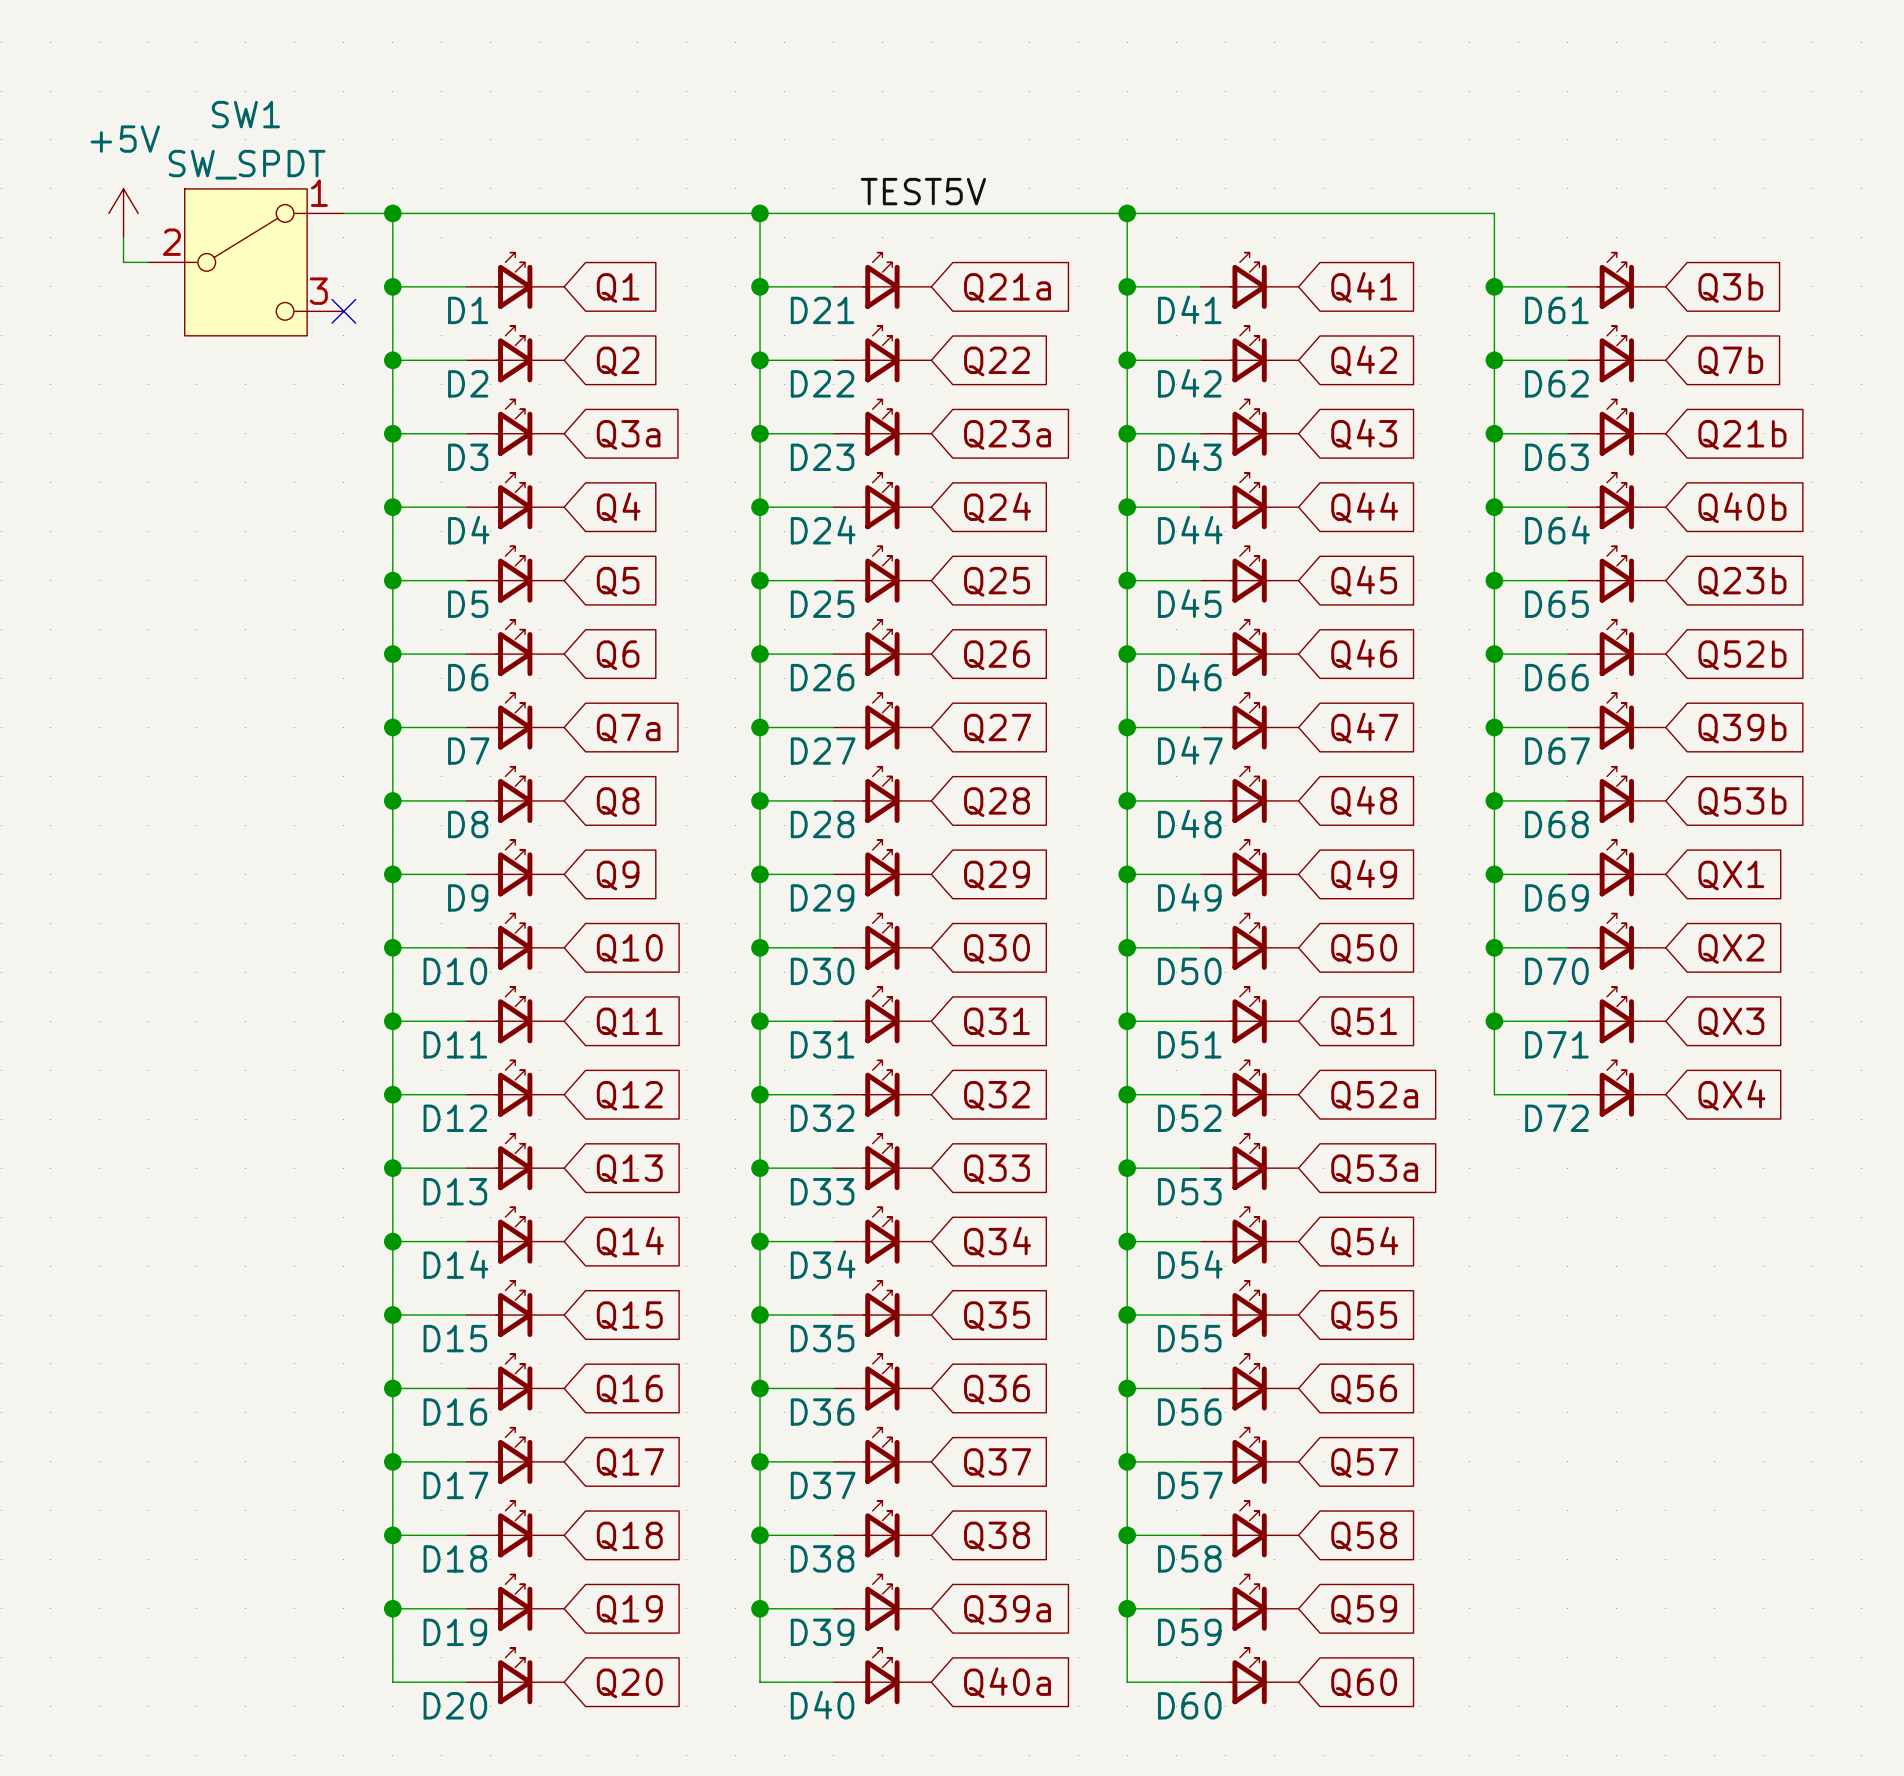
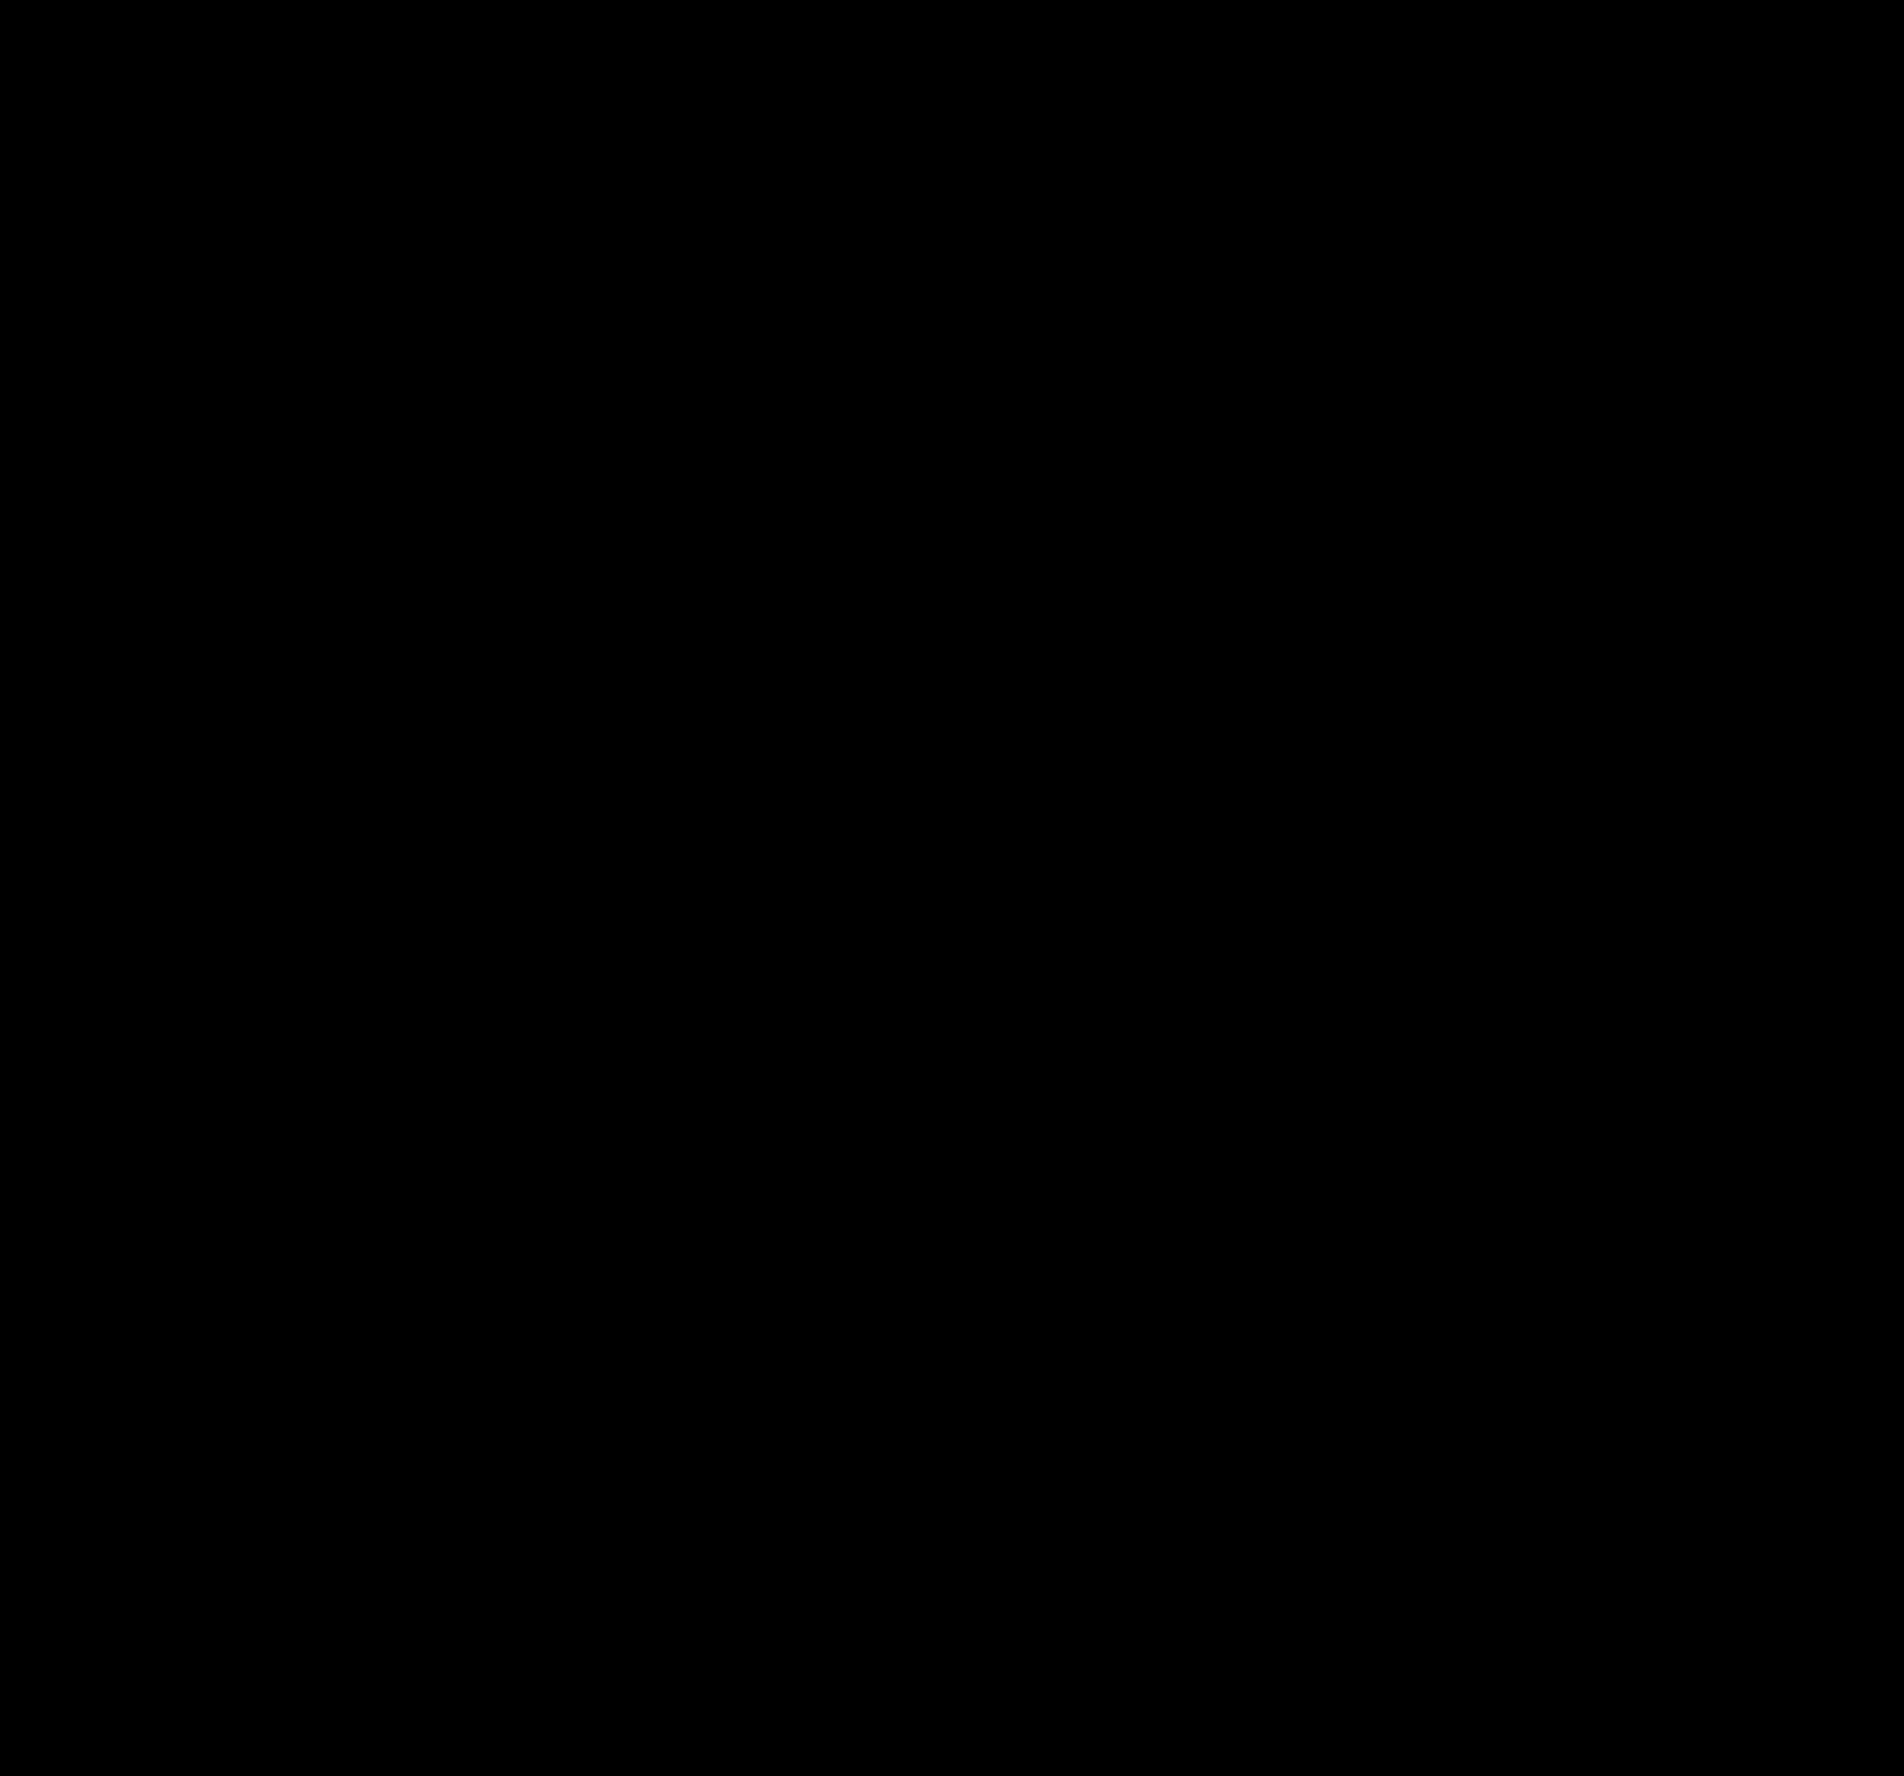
label: TEST5V (923, 191) -> none
power symbol: +5V (123, 213) -> none
wire: (343, 213) (1494, 213) (1494, 1094) (1567, 1094) -> none
wire: (392, 213) (392, 1682) (466, 1682) -> none
junction: (392, 213) -> none
wire: (760, 213) (760, 1682) (833, 1682) -> none
junction: (760, 213) -> none
wire: (1127, 213) (1127, 1682) (1200, 1682) -> none
junction: (1127, 213) -> none
wire: (123, 237) (123, 262) (148, 262) -> none
SW1: SW_SPDT (245, 262) -> none
D1: (515, 280) -> none
D21: (882, 280) -> none
D41: (1249, 280) -> none
D61: (1616, 280) -> none
wire: (392, 286) (466, 286) -> none
junction: (392, 286) -> none
wire: (760, 286) (833, 286) -> none
junction: (760, 286) -> none
wire: (1127, 286) (1200, 286) -> none
junction: (1127, 286) -> none
wire: (1494, 286) (1567, 286) -> none
junction: (1494, 286) -> none
global label: Q41 (1364, 287) -> none
global label: Q1 (618, 288) -> none
global label: Q21a (1007, 288) -> none
global label: Q3b (1730, 288) -> none
no-connect mark: (343, 311) -> none
D2: (515, 354) -> none
D22: (882, 354) -> none
D42: (1249, 354) -> none
D62: (1616, 354) -> none
wire: (392, 360) (466, 360) -> none
junction: (392, 360) -> none
wire: (760, 360) (833, 360) -> none
junction: (760, 360) -> none
wire: (1127, 360) (1200, 360) -> none
junction: (1127, 360) -> none
global label: Q42 (1364, 360) -> none
wire: (1494, 360) (1567, 360) -> none
junction: (1494, 360) -> none
global label: Q2 (618, 361) -> none
global label: Q22 (996, 361) -> none
global label: Q7b (1730, 361) -> none
D3: (515, 427) -> none
D23: (882, 427) -> none
D43: (1249, 427) -> none
D63: (1616, 427) -> none
wire: (392, 433) (466, 433) -> none
junction: (392, 433) -> none
wire: (760, 433) (833, 433) -> none
junction: (760, 433) -> none
wire: (1127, 433) (1200, 433) -> none
junction: (1127, 433) -> none
wire: (1494, 433) (1567, 433) -> none
junction: (1494, 433) -> none
global label: Q3a (628, 434) -> none
global label: Q23a (1007, 434) -> none
global label: Q43 (1364, 434) -> none
global label: Q21b (1742, 434) -> none
D4: (515, 501) -> none
D24: (882, 501) -> none
D44: (1249, 501) -> none
D64: (1616, 501) -> none
wire: (392, 507) (466, 507) -> none
junction: (392, 507) -> none
global label: Q4 (618, 507) -> none
wire: (760, 507) (833, 507) -> none
junction: (760, 507) -> none
global label: Q24 (997, 507) -> none
wire: (1127, 507) (1200, 507) -> none
junction: (1127, 507) -> none
global label: Q44 (1364, 507) -> none
wire: (1494, 507) (1567, 507) -> none
junction: (1494, 507) -> none
global label: Q40b (1742, 507) -> none
D5: (515, 574) -> none
D25: (882, 574) -> none
D45: (1249, 574) -> none
D65: (1616, 574) -> none
wire: (392, 580) (466, 580) -> none
junction: (392, 580) -> none
wire: (760, 580) (833, 580) -> none
junction: (760, 580) -> none
wire: (1127, 580) (1200, 580) -> none
junction: (1127, 580) -> none
wire: (1494, 580) (1567, 580) -> none
junction: (1494, 580) -> none
global label: Q5 (618, 581) -> none
global label: Q25 (996, 581) -> none
global label: Q45 (1364, 581) -> none
global label: Q23b (1742, 581) -> none
D6: (515, 647) -> none
D26: (882, 647) -> none
D46: (1249, 647) -> none
D66: (1616, 647) -> none
wire: (392, 654) (466, 654) -> none
junction: (392, 654) -> none
wire: (760, 654) (833, 654) -> none
junction: (760, 654) -> none
wire: (1127, 654) (1200, 654) -> none
junction: (1127, 654) -> none
global label: Q46 (1364, 654) -> none
wire: (1494, 654) (1567, 654) -> none
junction: (1494, 654) -> none
global label: Q6 (618, 655) -> none
global label: Q26 (996, 655) -> none
global label: Q52b (1742, 655) -> none
D7: (515, 721) -> none
D27: (882, 721) -> none
D47: (1249, 721) -> none
D67: (1616, 721) -> none
wire: (392, 727) (466, 727) -> none
junction: (392, 727) -> none
wire: (760, 727) (833, 727) -> none
junction: (760, 727) -> none
wire: (1127, 727) (1200, 727) -> none
junction: (1127, 727) -> none
wire: (1494, 727) (1567, 727) -> none
junction: (1494, 727) -> none
global label: Q7a (628, 728) -> none
global label: Q27 (997, 728) -> none
global label: Q47 (1364, 728) -> none
global label: Q39b (1742, 728) -> none
D8: (515, 794) -> none
D28: (882, 794) -> none
D48: (1249, 794) -> none
D68: (1616, 794) -> none
wire: (392, 800) (466, 800) -> none
junction: (392, 800) -> none
wire: (760, 800) (833, 800) -> none
junction: (760, 800) -> none
wire: (1127, 800) (1200, 800) -> none
junction: (1127, 800) -> none
wire: (1494, 800) (1567, 800) -> none
junction: (1494, 800) -> none
global label: Q48 (1364, 801) -> none
global label: Q8 (618, 802) -> none
global label: Q28 (996, 802) -> none
global label: Q53b (1742, 802) -> none
D9: (515, 868) -> none
D29: (882, 868) -> none
D49: (1249, 868) -> none
D69: (1616, 868) -> none
wire: (392, 874) (466, 874) -> none
junction: (392, 874) -> none
wire: (760, 874) (833, 874) -> none
junction: (760, 874) -> none
wire: (1127, 874) (1200, 874) -> none
junction: (1127, 874) -> none
global label: Q49 (1364, 874) -> none
wire: (1494, 874) (1567, 874) -> none
junction: (1494, 874) -> none
global label: Q9 (618, 875) -> none
global label: Q29 (996, 875) -> none
global label: QX1 (1731, 875) -> none
D10: (515, 941) -> none
D30: (882, 941) -> none
D50: (1249, 941) -> none
D70: (1616, 941) -> none
wire: (392, 947) (466, 947) -> none
junction: (392, 947) -> none
wire: (760, 947) (833, 947) -> none
junction: (760, 947) -> none
wire: (1127, 947) (1200, 947) -> none
junction: (1127, 947) -> none
wire: (1494, 947) (1567, 947) -> none
junction: (1494, 947) -> none
global label: Q10 (629, 948) -> none
global label: Q30 (996, 948) -> none
global label: Q50 (1364, 948) -> none
global label: QX2 (1731, 948) -> none
D11: (515, 1015) -> none
D31: (882, 1015) -> none
D51: (1249, 1015) -> none
D71: (1616, 1015) -> none
wire: (392, 1021) (466, 1021) -> none
junction: (392, 1021) -> none
wire: (760, 1021) (833, 1021) -> none
junction: (760, 1021) -> none
wire: (1127, 1021) (1200, 1021) -> none
junction: (1127, 1021) -> none
wire: (1494, 1021) (1567, 1021) -> none
junction: (1494, 1021) -> none
global label: Q11 (629, 1022) -> none
global label: Q31 (996, 1022) -> none
global label: Q51 (1364, 1022) -> none
global label: QX3 (1731, 1022) -> none
D12: (515, 1088) -> none
D32: (882, 1088) -> none
D52: (1249, 1088) -> none
D72: (1616, 1088) -> none
wire: (392, 1094) (466, 1094) -> none
junction: (392, 1094) -> none
wire: (760, 1094) (833, 1094) -> none
junction: (760, 1094) -> none
wire: (1127, 1094) (1200, 1094) -> none
junction: (1127, 1094) -> none
global label: Q12 (629, 1095) -> none
global label: Q32 (996, 1095) -> none
global label: Q52a (1374, 1095) -> none
global label: QX4 (1731, 1095) -> none
D13: (515, 1162) -> none
D33: (882, 1162) -> none
D53: (1249, 1162) -> none
wire: (392, 1168) (466, 1168) -> none
junction: (392, 1168) -> none
wire: (760, 1168) (833, 1168) -> none
junction: (760, 1168) -> none
wire: (1127, 1168) (1200, 1168) -> none
junction: (1127, 1168) -> none
global label: Q13 (629, 1169) -> none
global label: Q33 (996, 1169) -> none
global label: Q53a (1374, 1169) -> none
D14: (515, 1235) -> none
D34: (882, 1235) -> none
D54: (1249, 1235) -> none
wire: (392, 1241) (466, 1241) -> none
junction: (392, 1241) -> none
wire: (760, 1241) (833, 1241) -> none
junction: (760, 1241) -> none
wire: (1127, 1241) (1200, 1241) -> none
junction: (1127, 1241) -> none
global label: Q14 (630, 1242) -> none
global label: Q34 (997, 1242) -> none
global label: Q54 (1364, 1242) -> none
D15: (515, 1308) -> none
D35: (882, 1308) -> none
D55: (1249, 1308) -> none
wire: (392, 1315) (466, 1315) -> none
junction: (392, 1315) -> none
wire: (760, 1315) (833, 1315) -> none
junction: (760, 1315) -> none
wire: (1127, 1315) (1200, 1315) -> none
junction: (1127, 1315) -> none
global label: Q15 (629, 1316) -> none
global label: Q35 (996, 1316) -> none
global label: Q55 (1364, 1316) -> none
D16: (515, 1382) -> none
D36: (882, 1382) -> none
D56: (1249, 1382) -> none
wire: (392, 1388) (466, 1388) -> none
junction: (392, 1388) -> none
wire: (760, 1388) (833, 1388) -> none
junction: (760, 1388) -> none
wire: (1127, 1388) (1200, 1388) -> none
junction: (1127, 1388) -> none
global label: Q16 (629, 1389) -> none
global label: Q36 (996, 1389) -> none
global label: Q56 (1364, 1389) -> none
D17: (515, 1455) -> none
D37: (882, 1455) -> none
D57: (1249, 1455) -> none
wire: (392, 1461) (466, 1461) -> none
junction: (392, 1461) -> none
wire: (760, 1461) (833, 1461) -> none
junction: (760, 1461) -> none
wire: (1127, 1461) (1200, 1461) -> none
junction: (1127, 1461) -> none
global label: Q17 (630, 1463) -> none
global label: Q37 (997, 1463) -> none
global label: Q57 (1364, 1463) -> none
D18: (515, 1529) -> none
D38: (882, 1529) -> none
D58: (1249, 1529) -> none
wire: (392, 1535) (466, 1535) -> none
junction: (392, 1535) -> none
wire: (760, 1535) (833, 1535) -> none
junction: (760, 1535) -> none
wire: (1127, 1535) (1200, 1535) -> none
junction: (1127, 1535) -> none
global label: Q18 (629, 1536) -> none
global label: Q38 (996, 1536) -> none
global label: Q58 (1364, 1536) -> none
D19: (515, 1602) -> none
D39: (882, 1602) -> none
D59: (1249, 1602) -> none
wire: (392, 1608) (466, 1608) -> none
junction: (392, 1608) -> none
wire: (760, 1608) (833, 1608) -> none
junction: (760, 1608) -> none
wire: (1127, 1608) (1200, 1608) -> none
junction: (1127, 1608) -> none
global label: Q19 (629, 1609) -> none
global label: Q39a (1007, 1609) -> none
global label: Q59 (1364, 1609) -> none
D20: (515, 1676) -> none
D40: (882, 1676) -> none
D60: (1249, 1676) -> none
global label: Q40a (1007, 1682) -> none
global label: Q20 (629, 1683) -> none
global label: Q60 (1364, 1683) -> none

